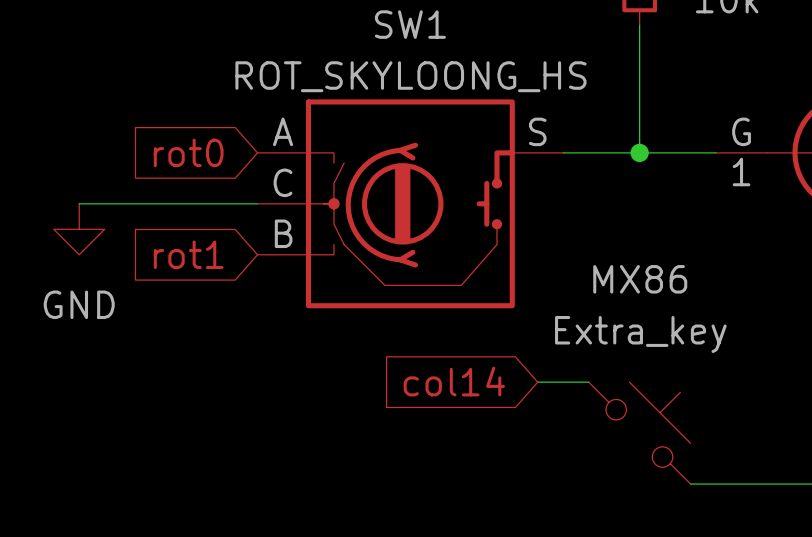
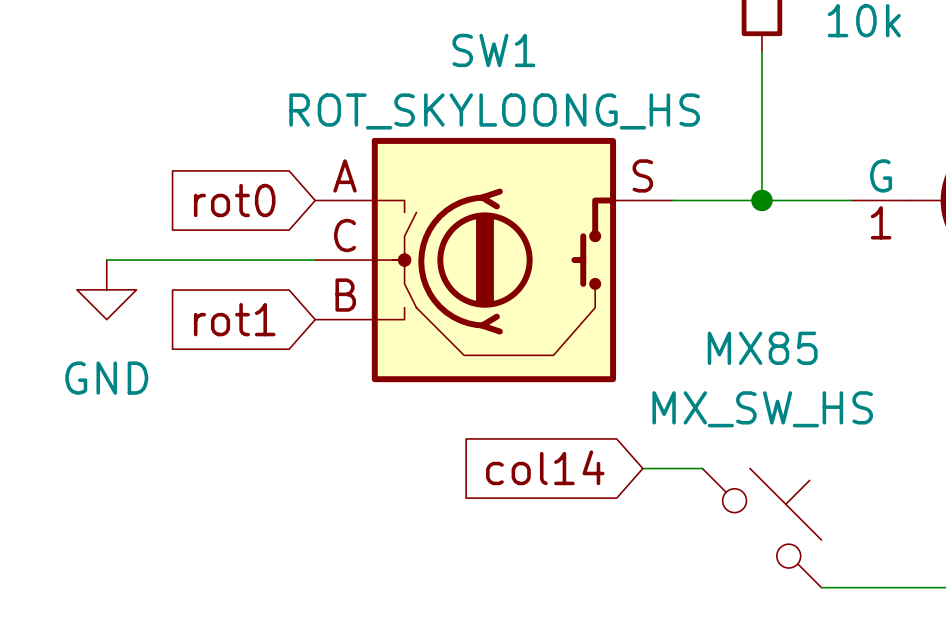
MX86 name: MX86 (640, 279) -> MX85 (762, 348)
MX86 value: Extra_key (640, 334) -> MX_SW_HS (762, 409)

